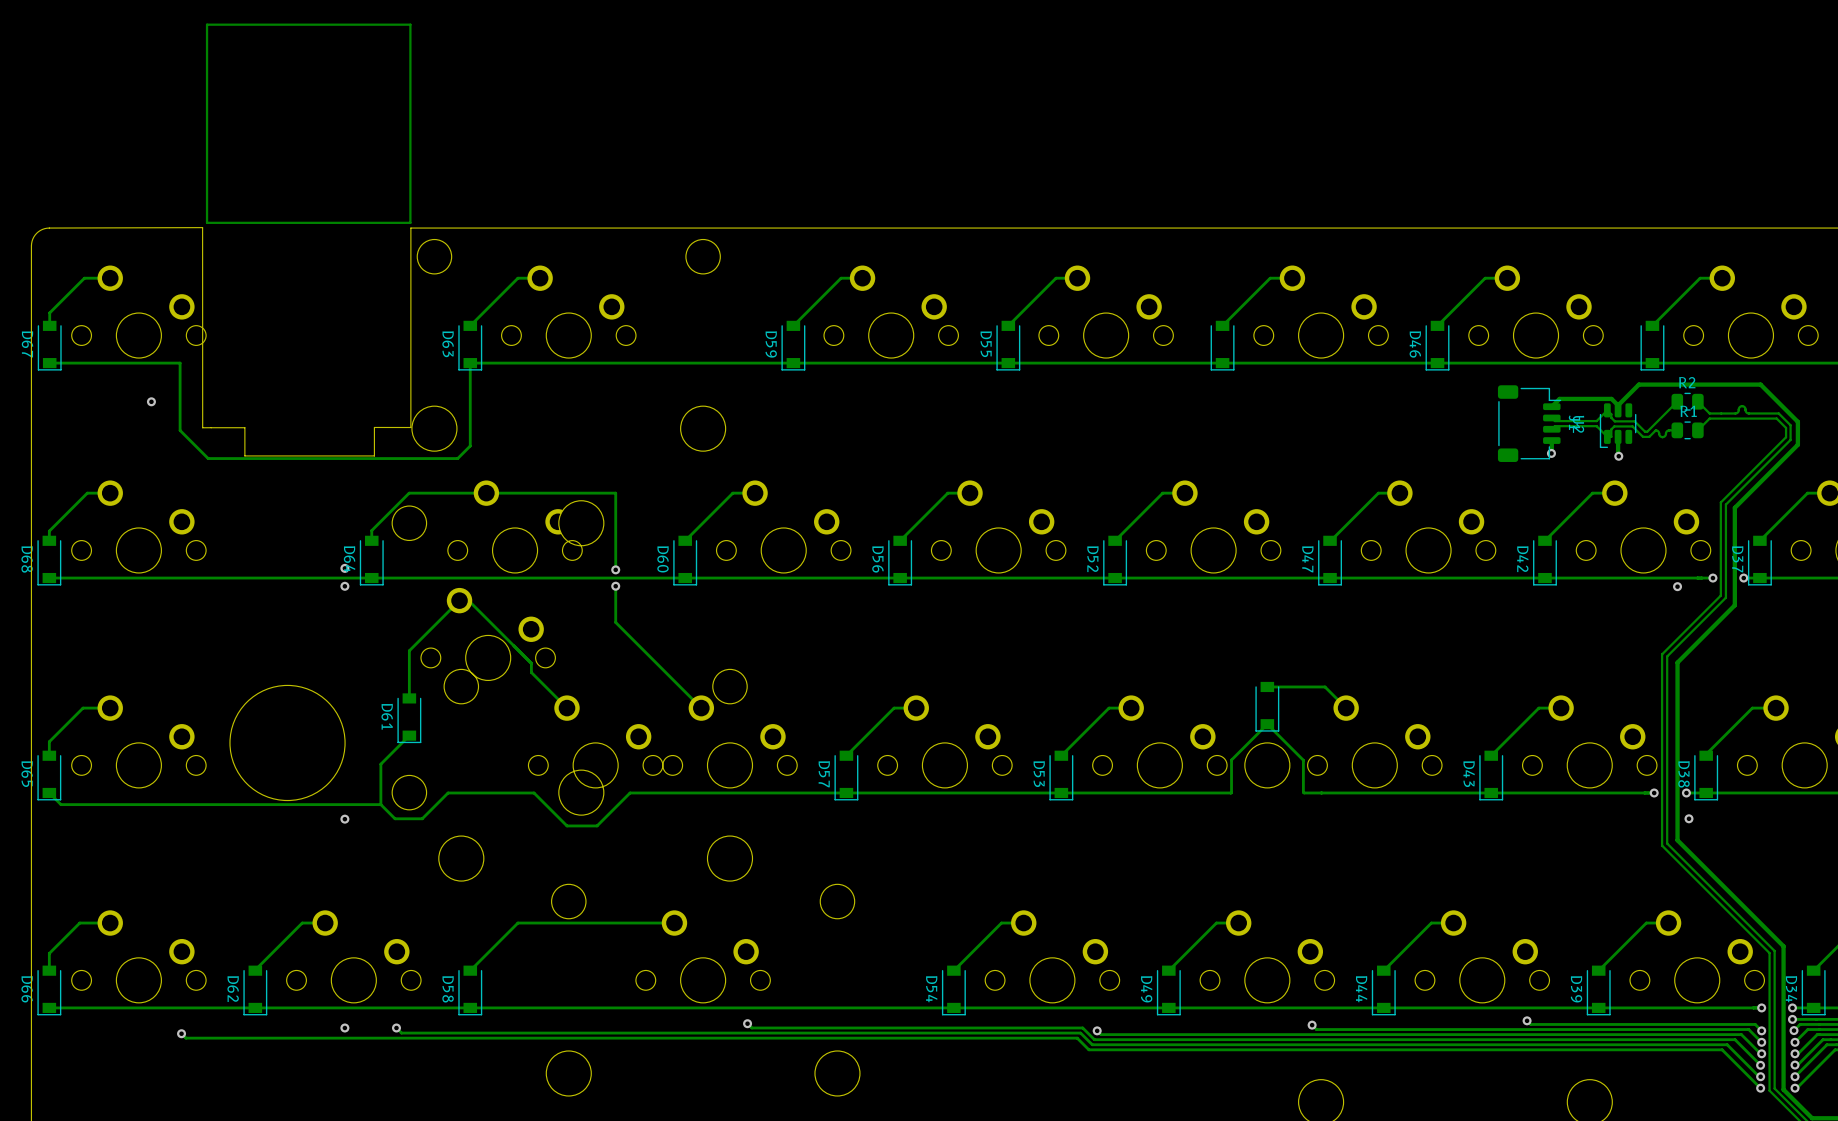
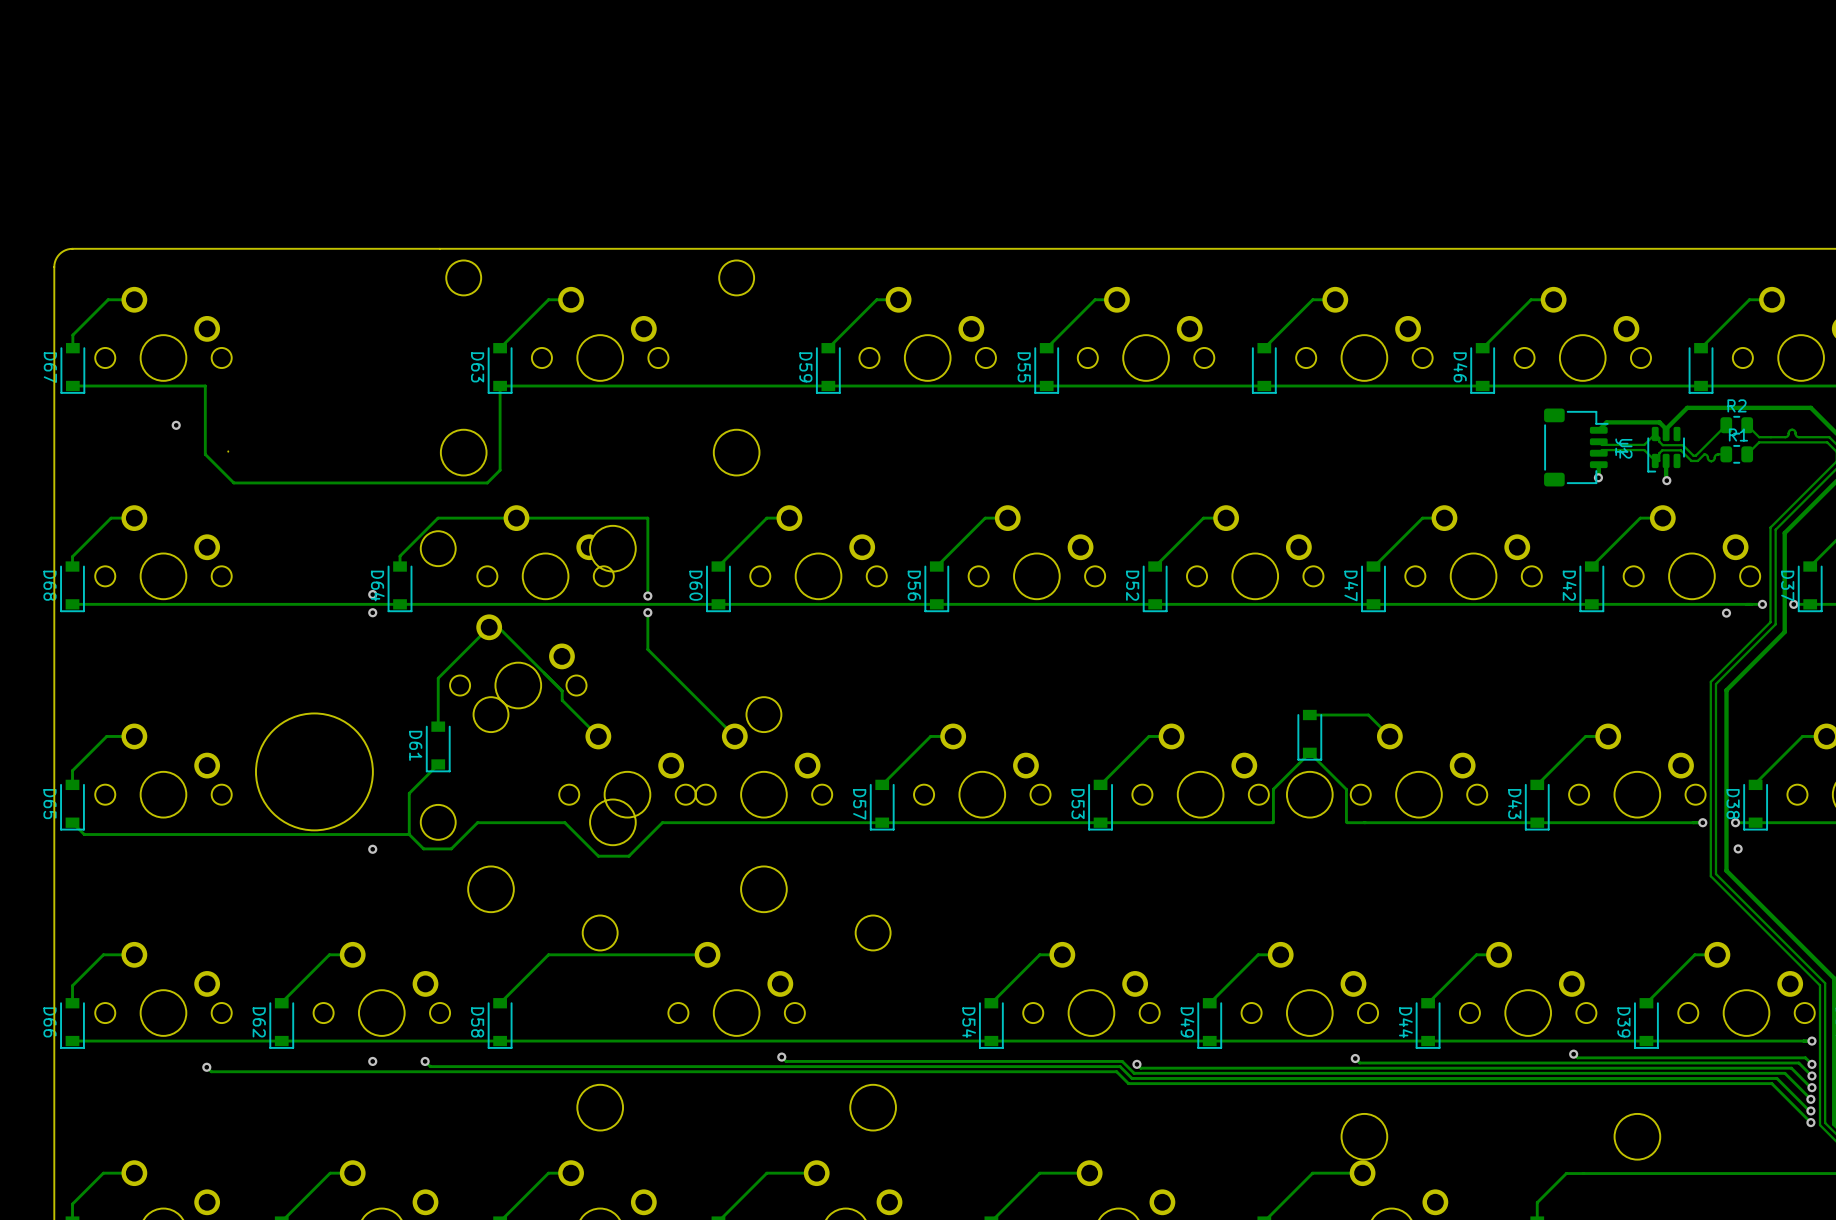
track: (410, 24) (207, 24) (207, 222) (410, 222) (410, 24) -> none
board edge: (49, 228) (202, 227) (202, 427) -> none
board edge: (410, 228) (410, 427) (374, 427) (374, 455) (244, 455) (244, 427) (202, 427) -> (439, 248) (72, 248)

